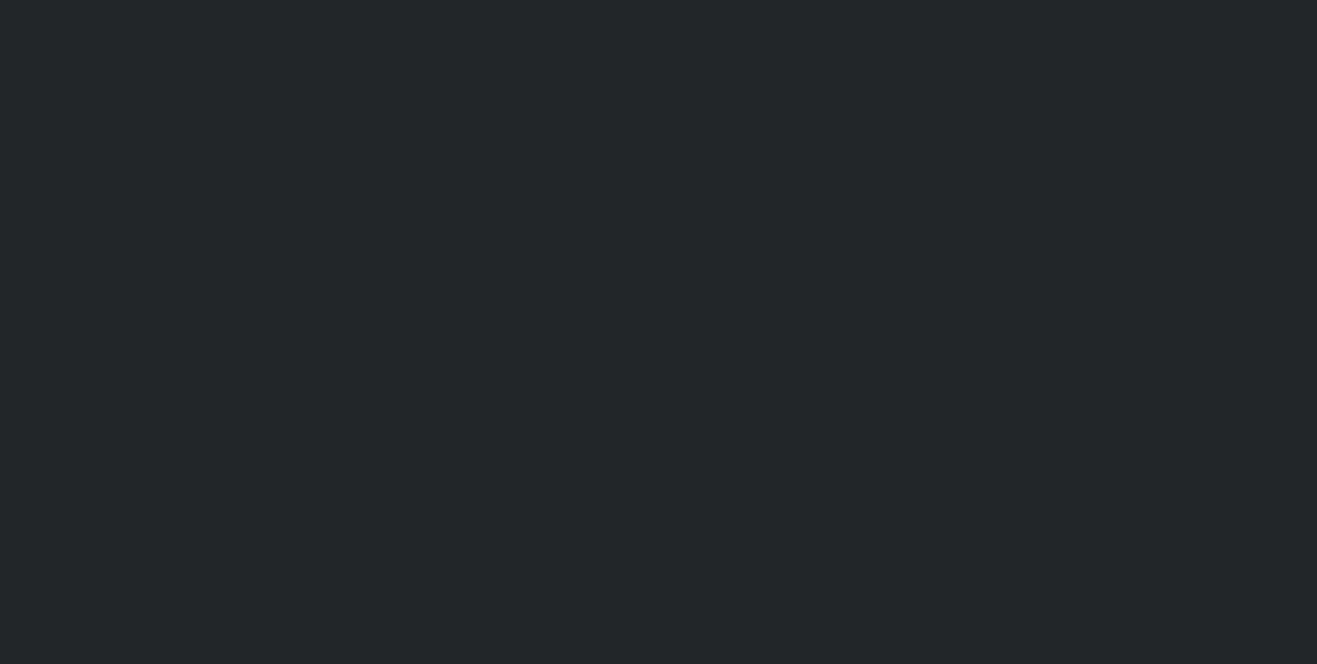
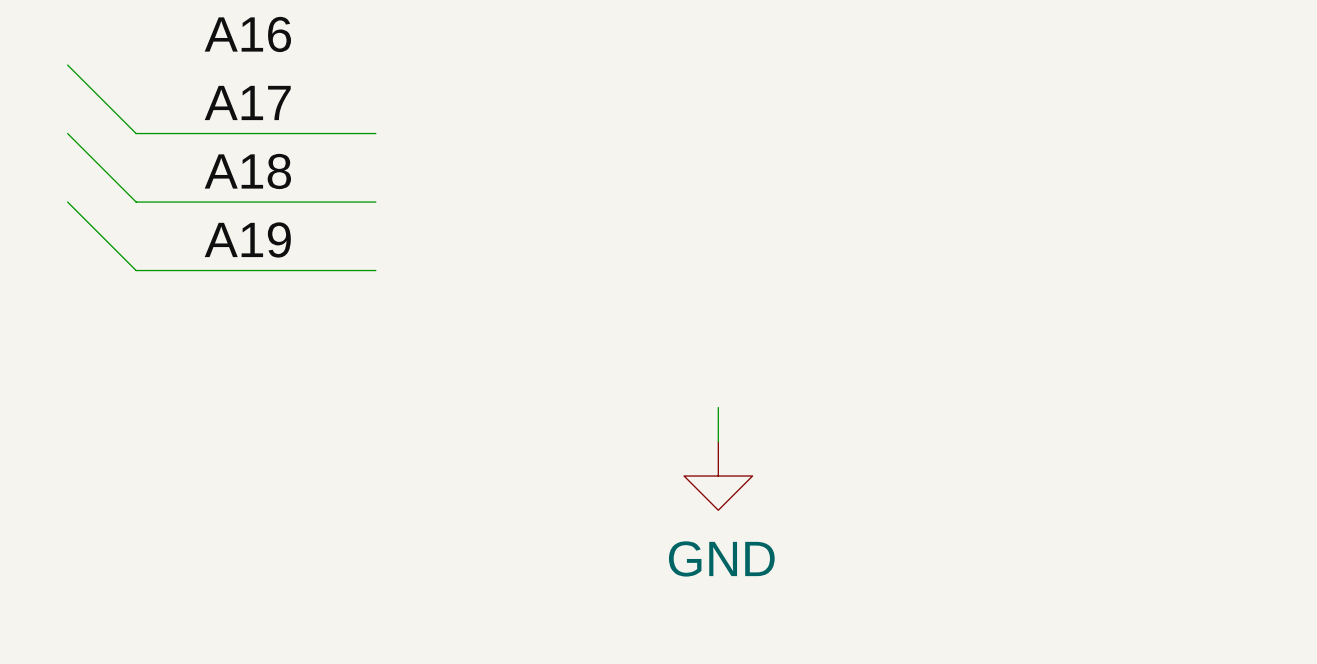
label: none -> A16 (247, 34)
wire: none -> (67, 65) (136, 133) (375, 133)
label: none -> A17 (247, 102)
wire: none -> (67, 133) (136, 202)
label: none -> A18 (247, 171)
wire: none -> (67, 202) (136, 270) (375, 270)
wire: none -> (136, 202) (375, 202)
label: none -> A19 (247, 239)
wire: none -> (718, 407) (718, 441)
power symbol: none -> GND (718, 476)

